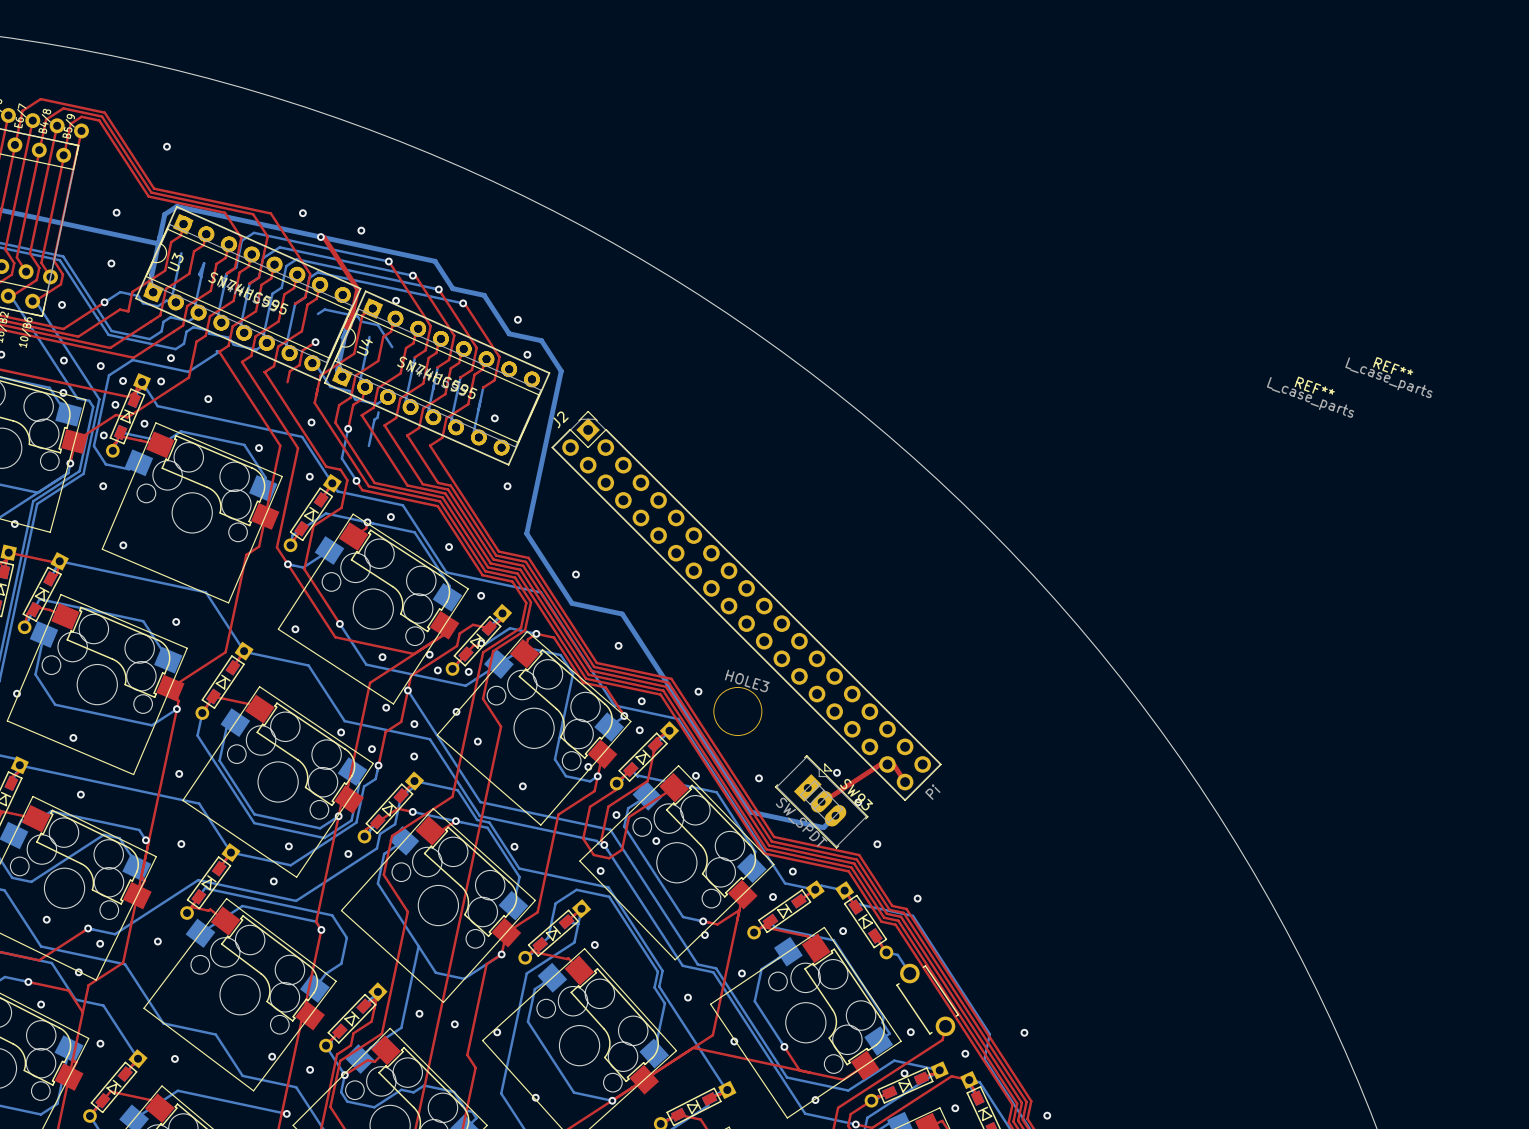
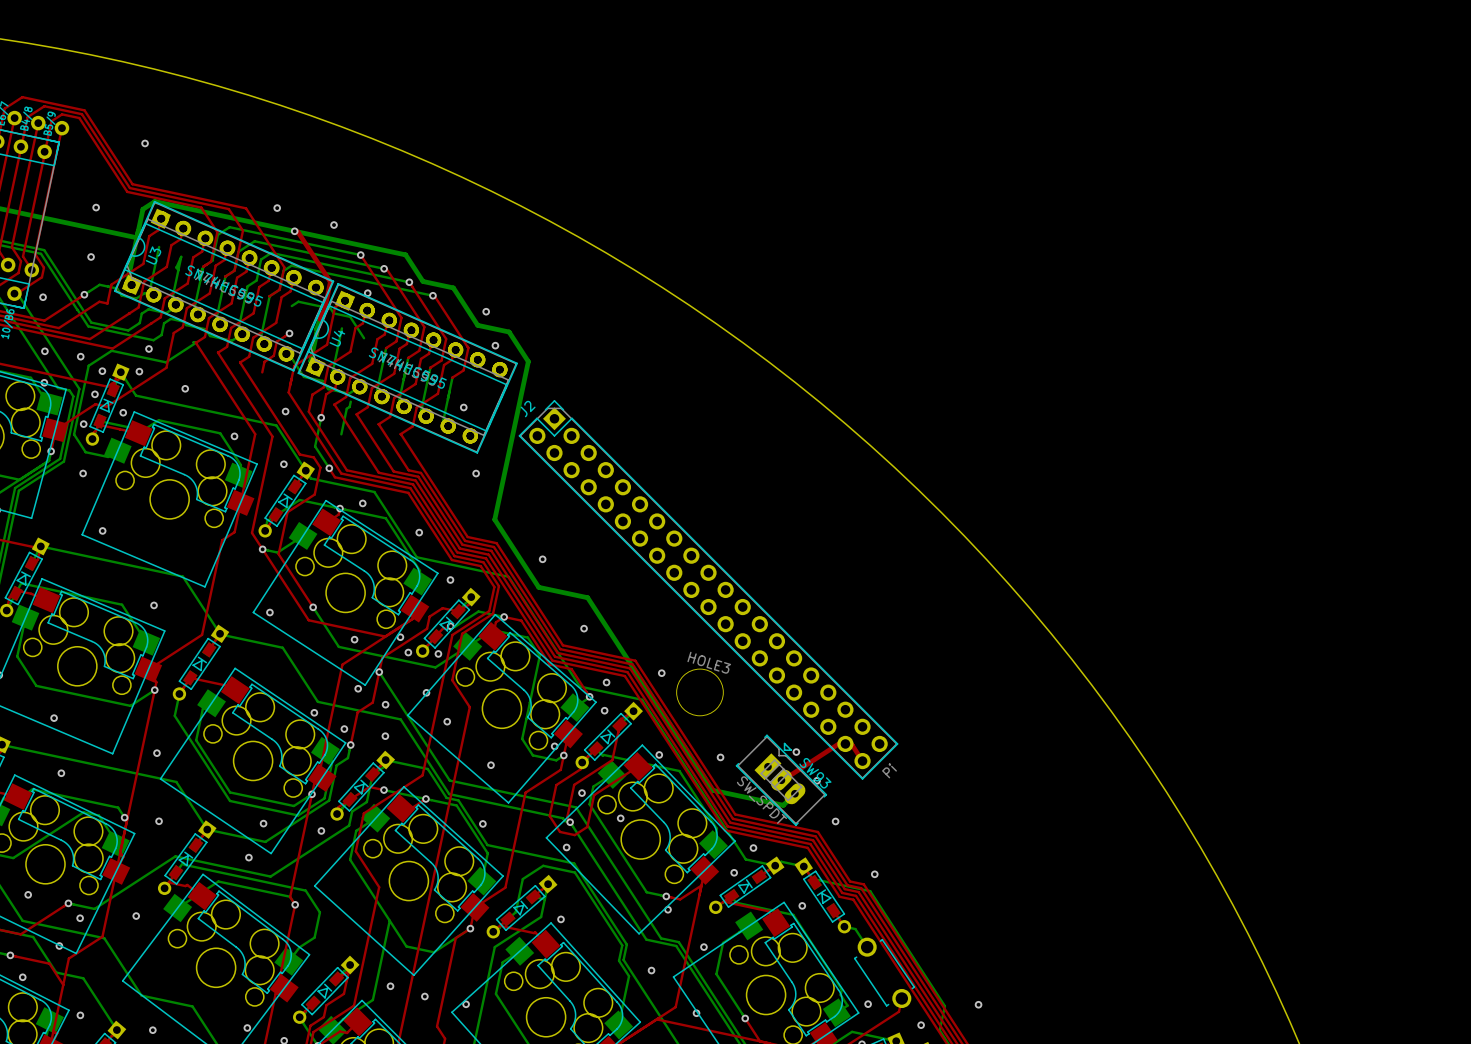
REF**: L_case_parts (1388, 377) -> none
REF**: L_case_parts (1310, 397) -> none

